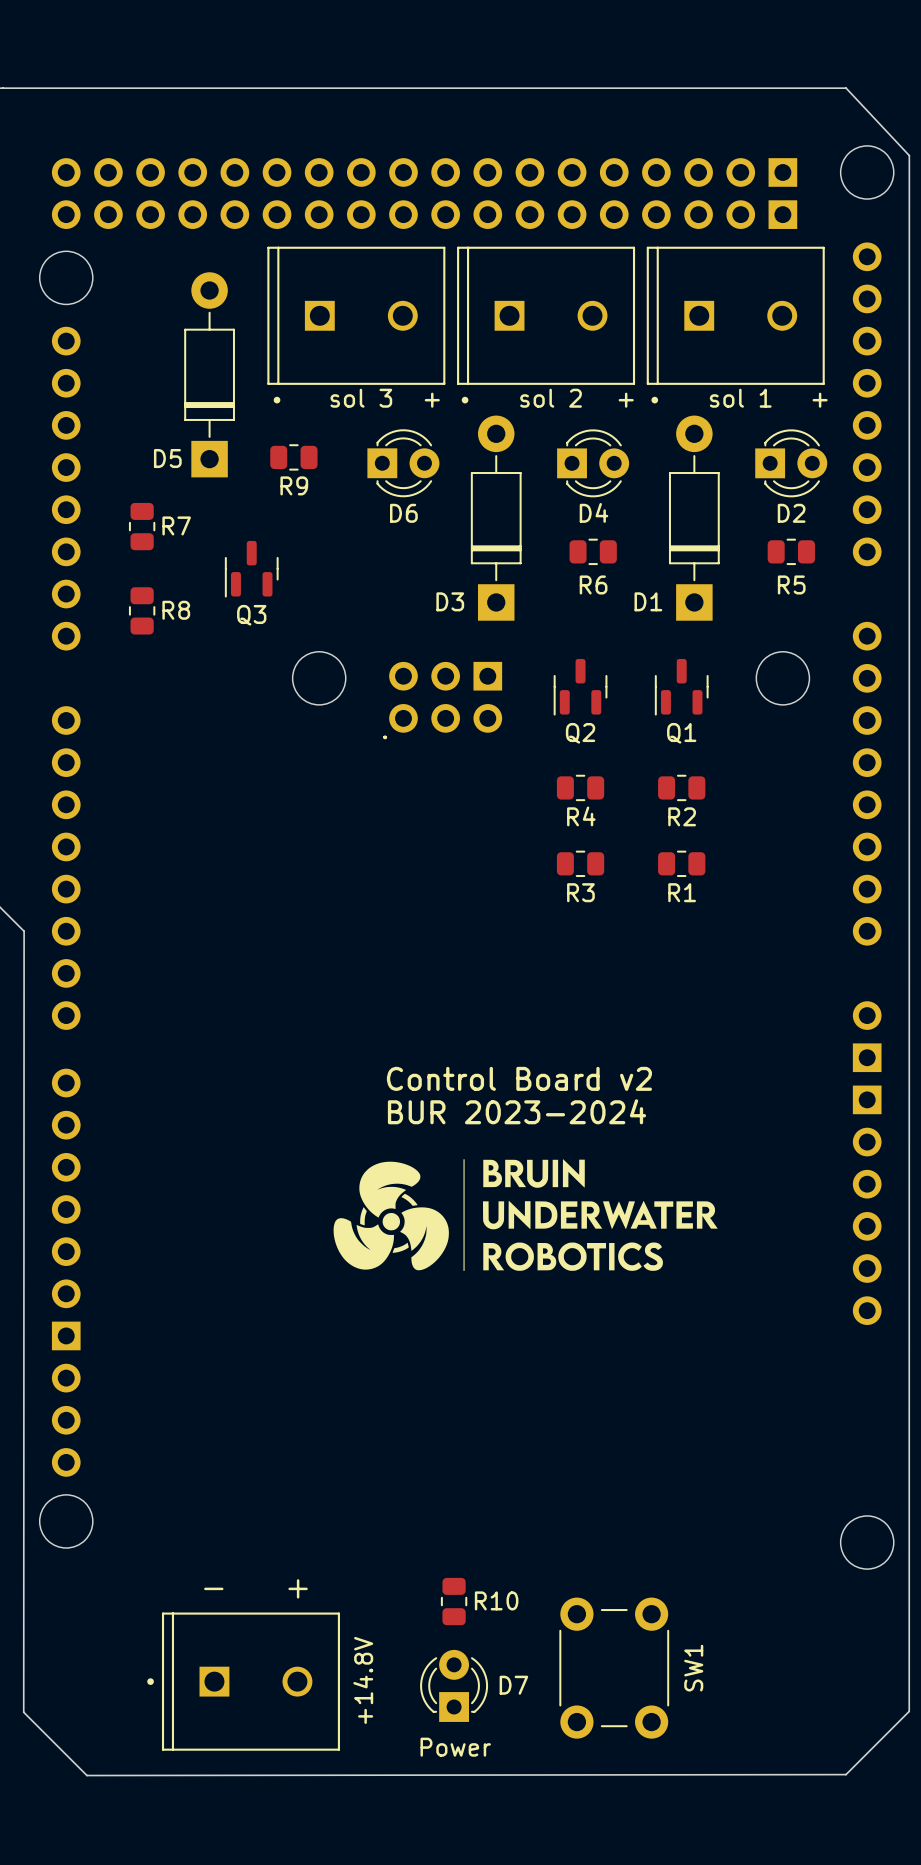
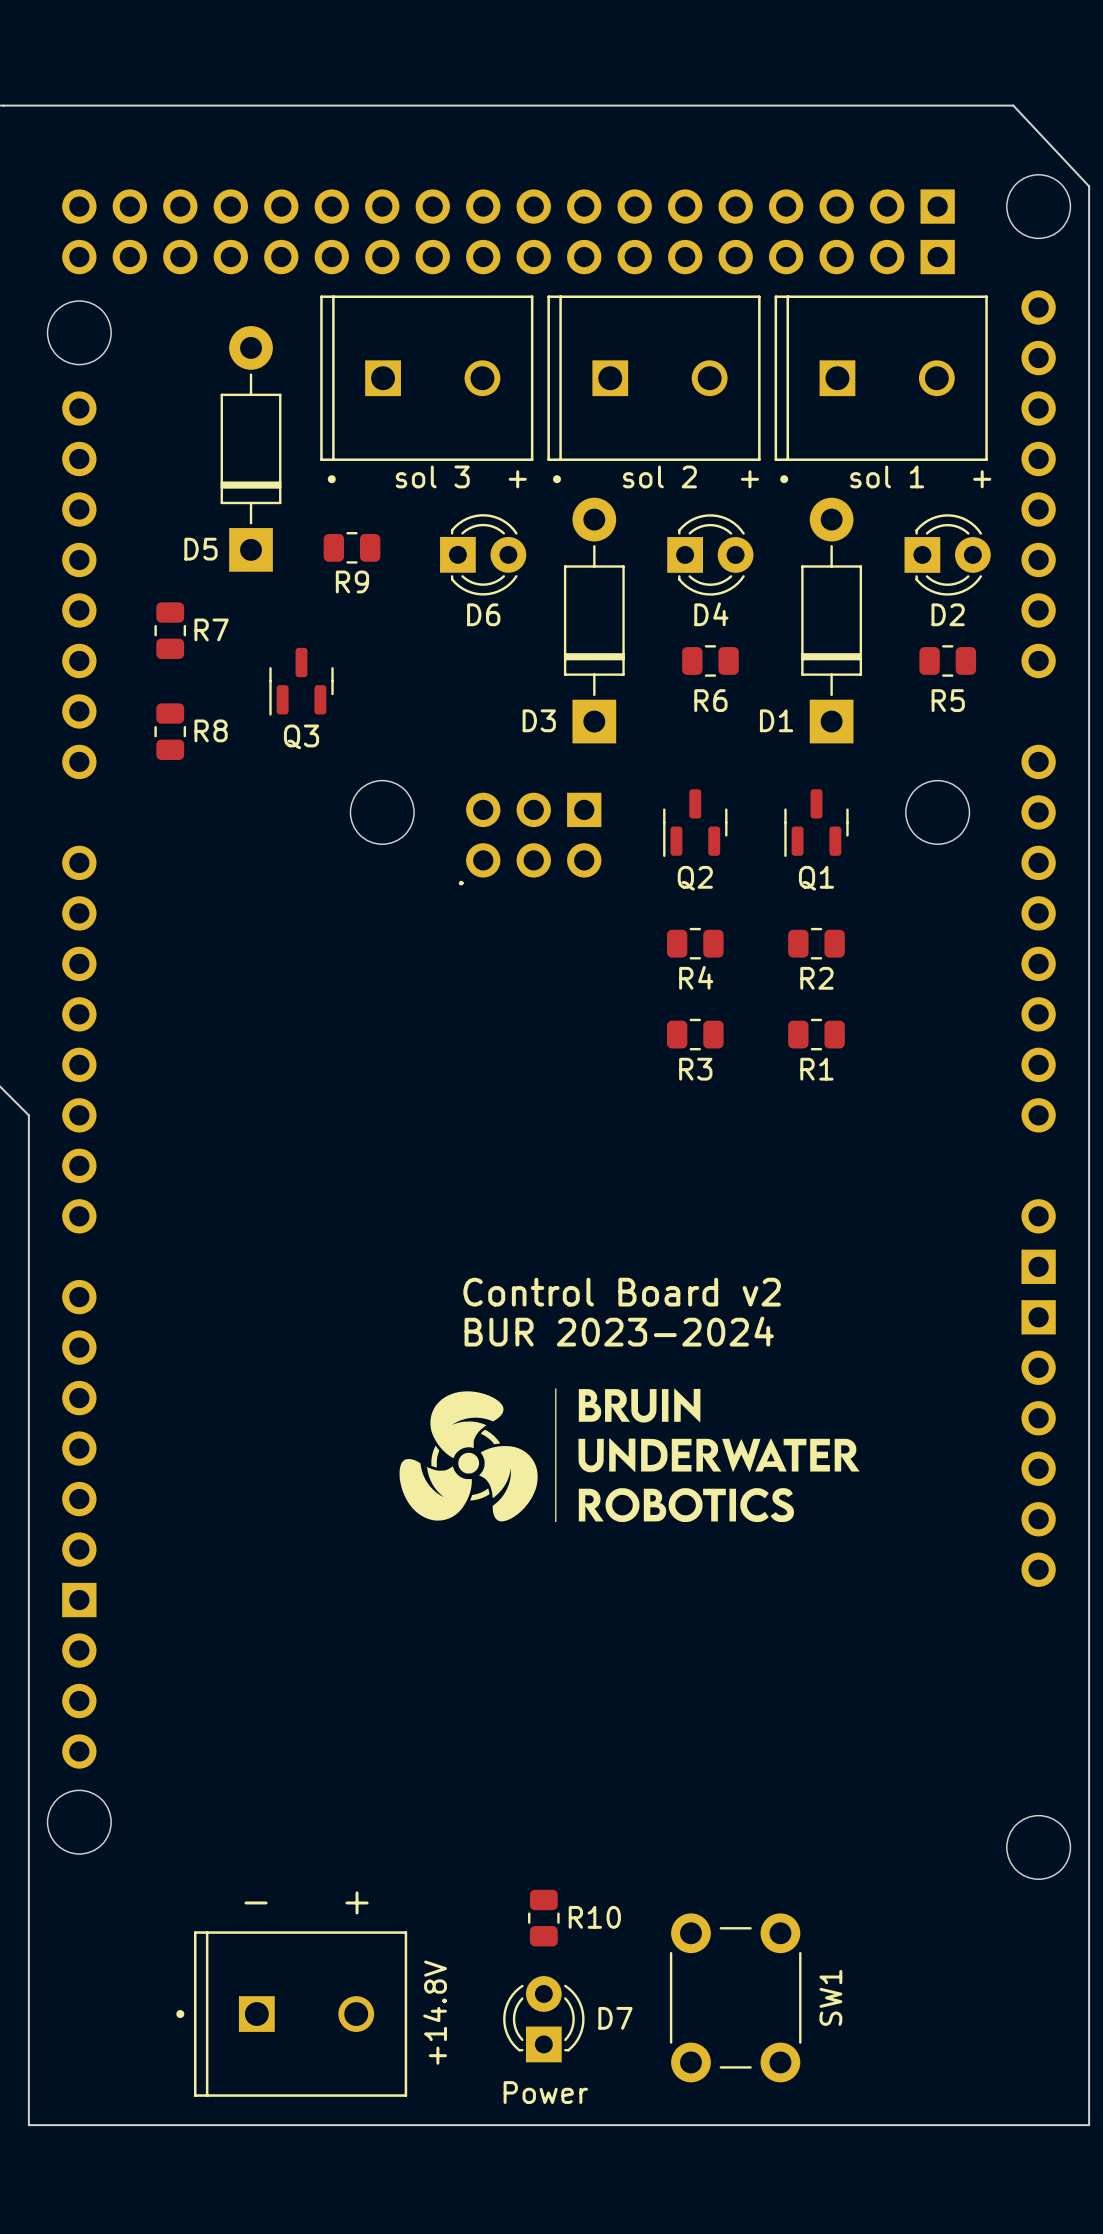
board edge: (909, 155) (909, 1711) (846, 1774) (86, 1775) (23, 1712) (24, 931) -> (1089, 186) (1089, 2125) (28, 2125) (28, 1115)

